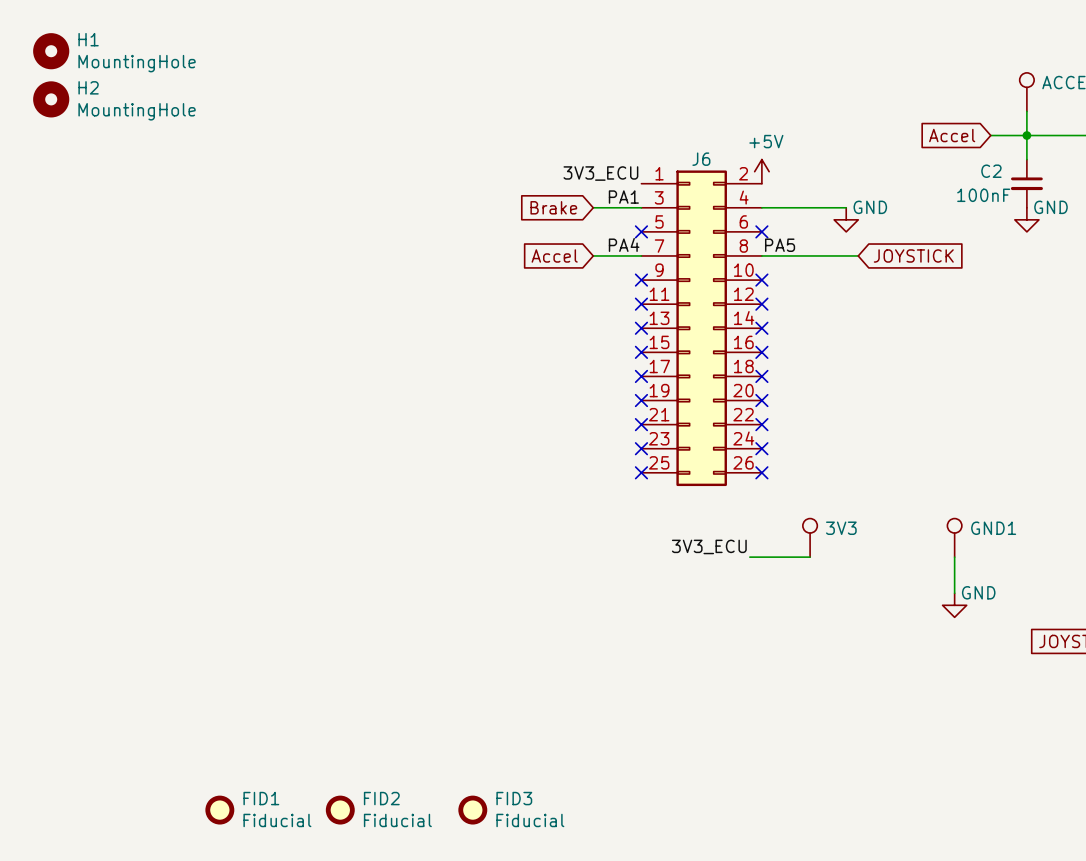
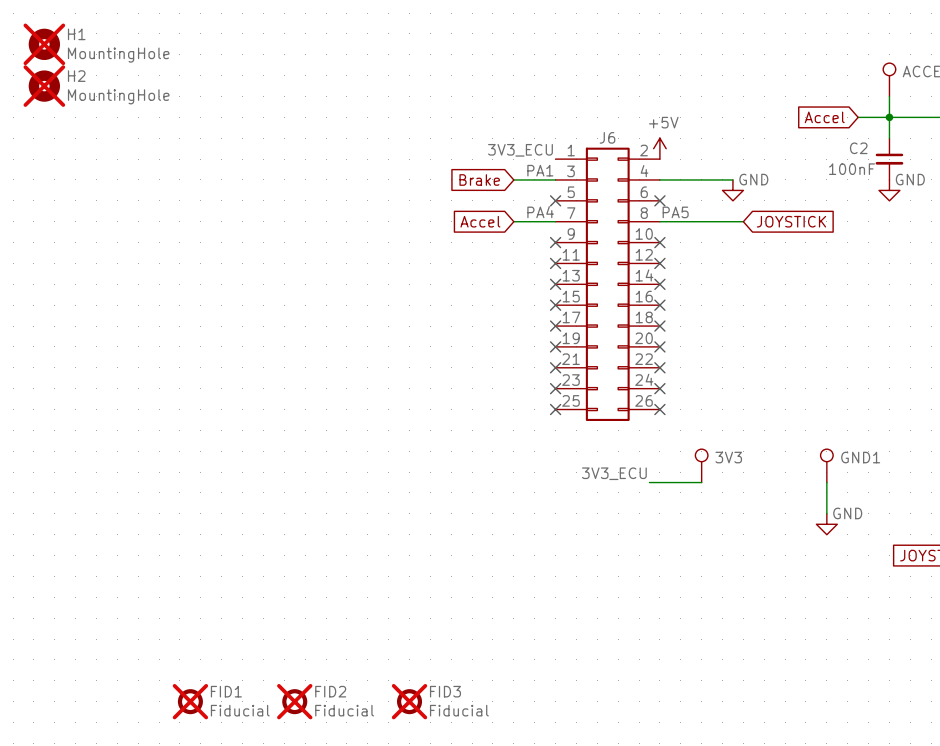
H1 do-not-place cross: none -> (44, 44)
H2 do-not-place cross: none -> (44, 86)
FID1 do-not-place cross: none -> (190, 701)
FID2 do-not-place cross: none -> (294, 701)
FID3 do-not-place cross: none -> (409, 701)

